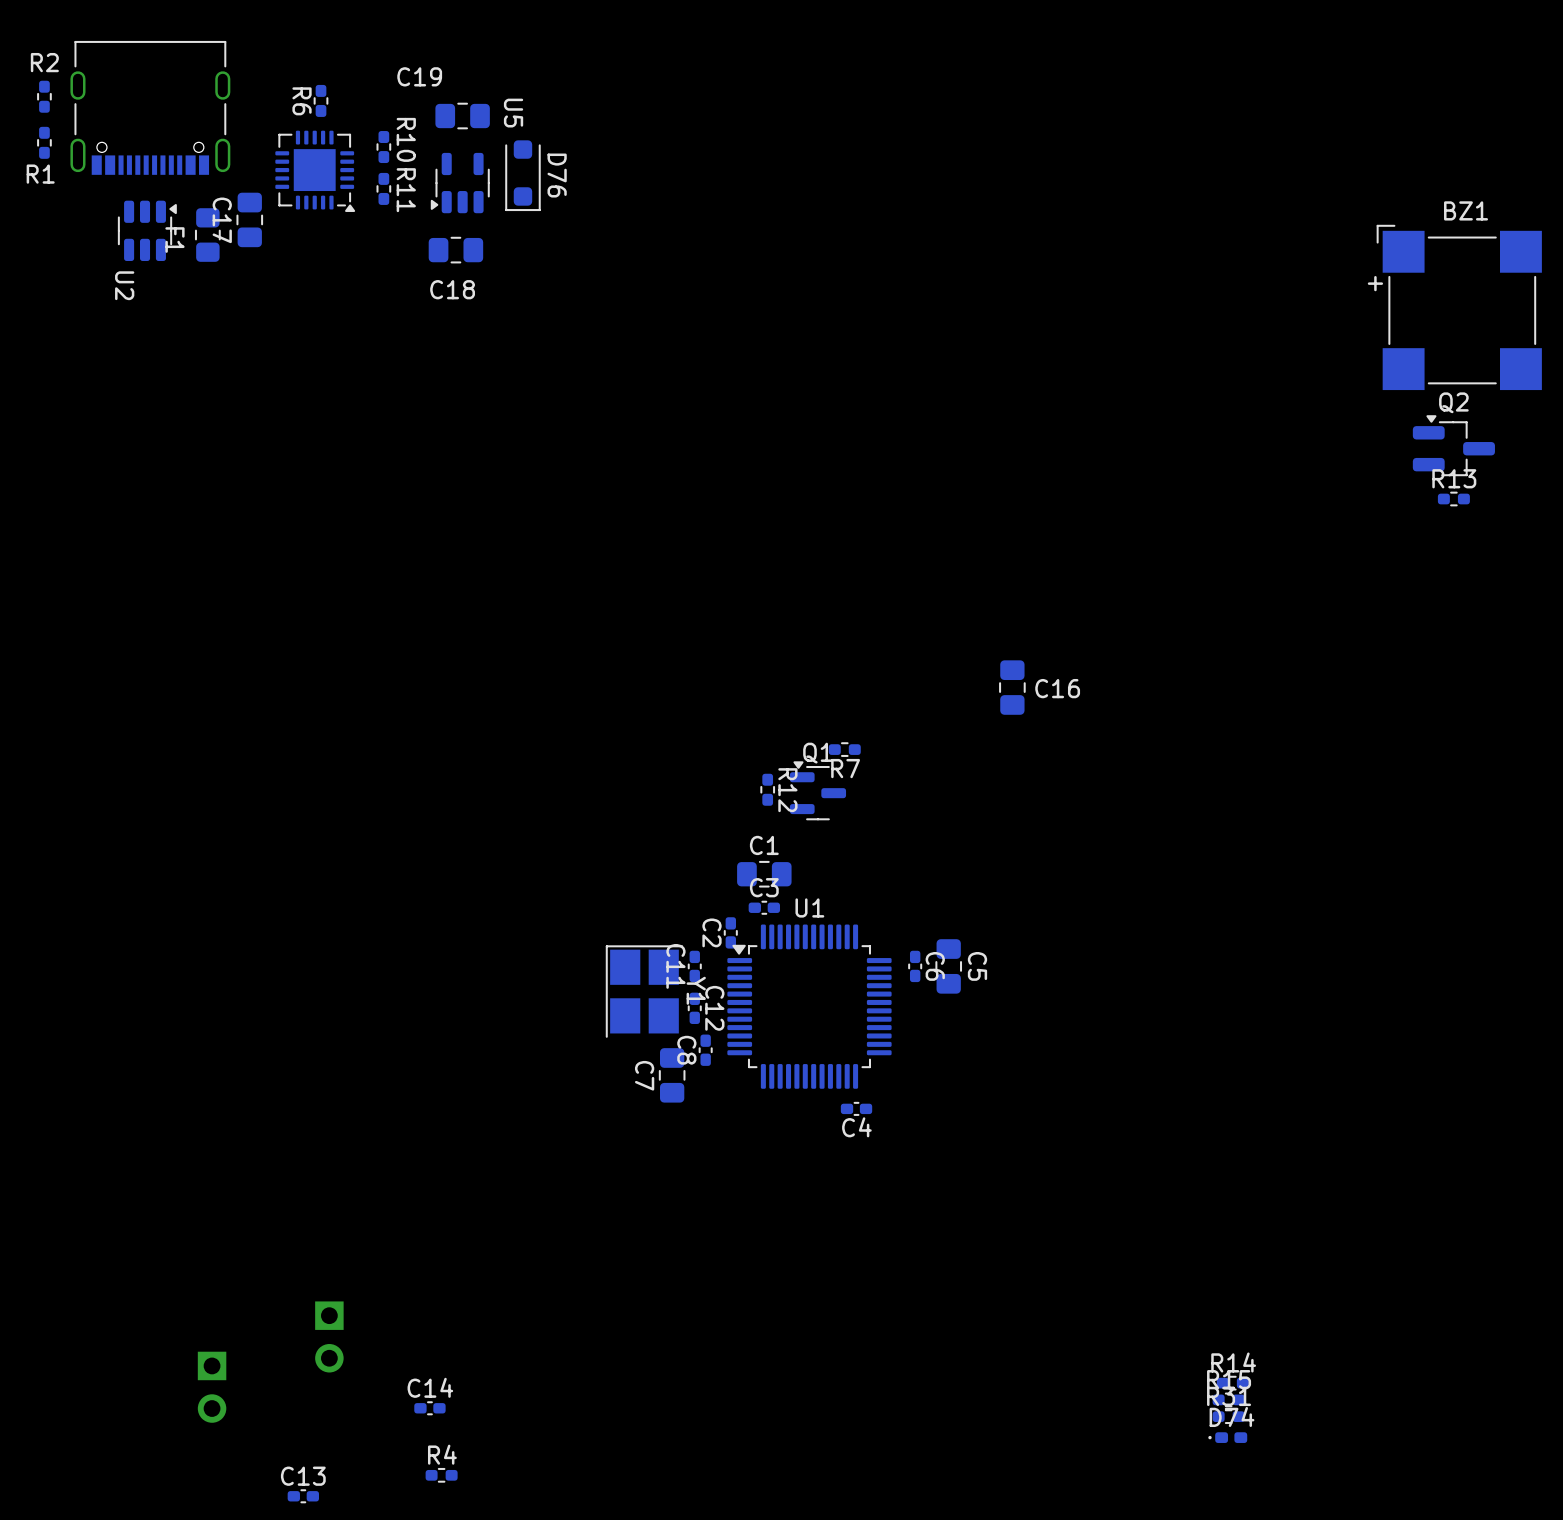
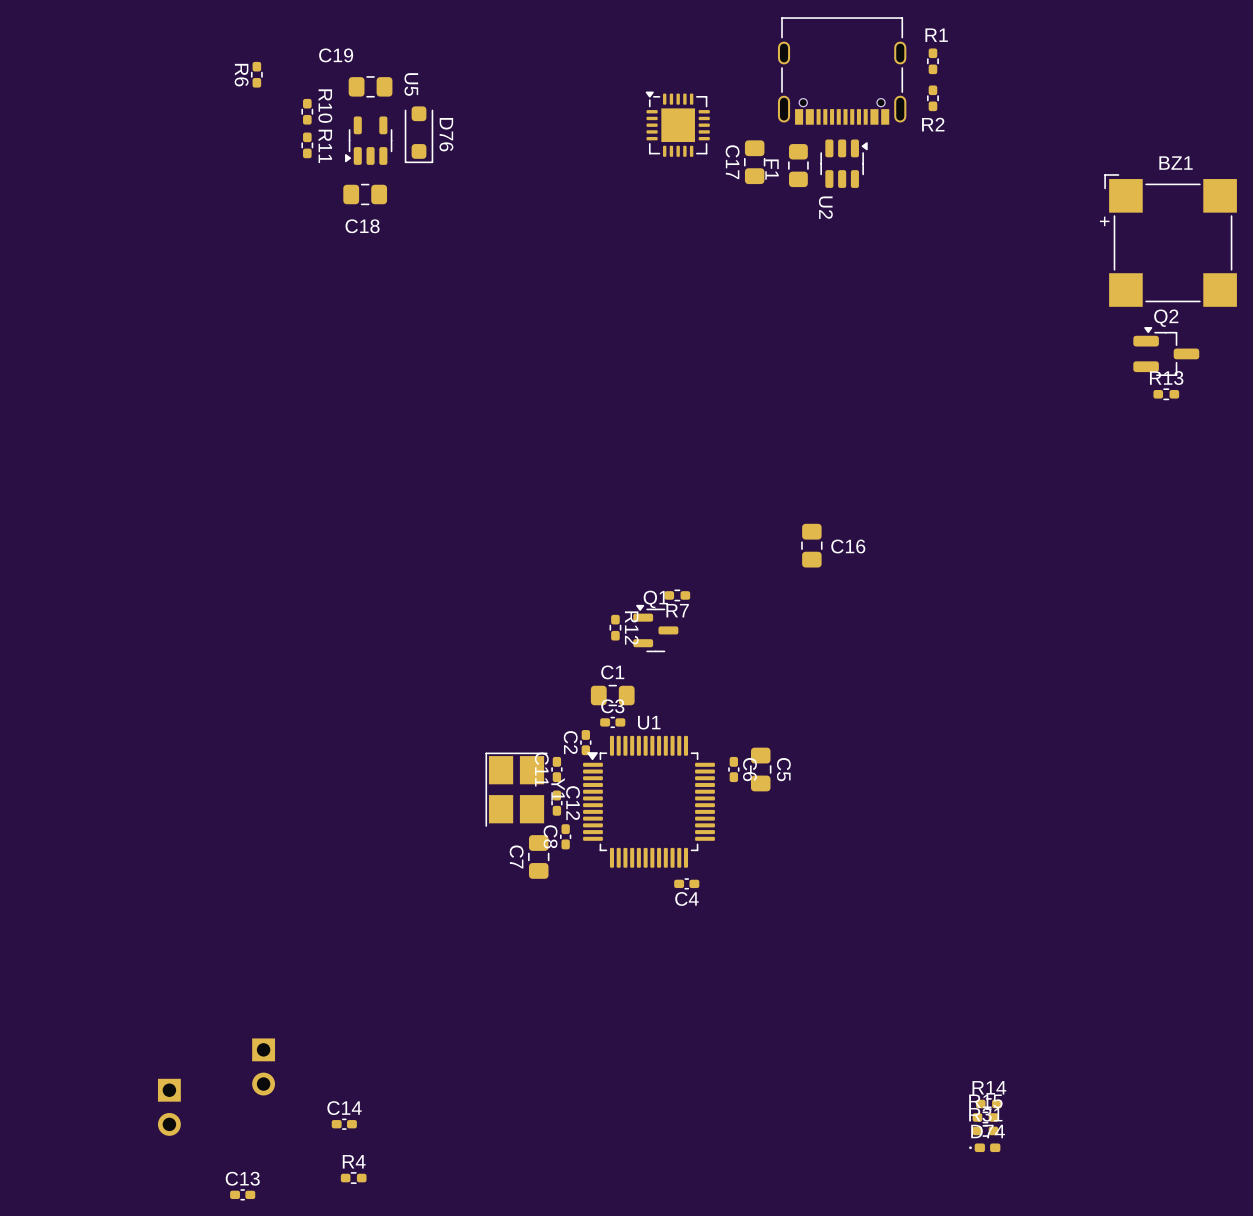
R2 name position: R2 (44, 62) -> R2 (933, 124)
R2 position: (44, 96) -> (932, 98)
part: none -> (842, 70)
part: (150, 107) -> none
R1 position: (44, 142) -> (932, 61)
part: none -> (677, 124)
part: (315, 171) -> none
R1 name position: R1 (40, 174) -> R1 (936, 35)
C17 position: (249, 219) -> (754, 162)
U2 position: (147, 230) -> (844, 163)
F1 position: (207, 235) -> (798, 165)

